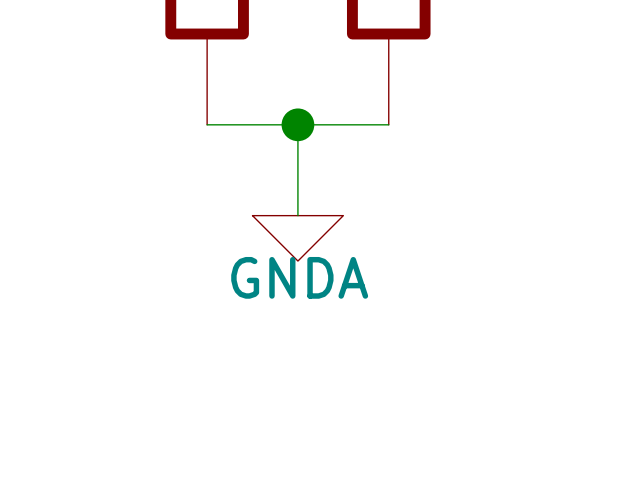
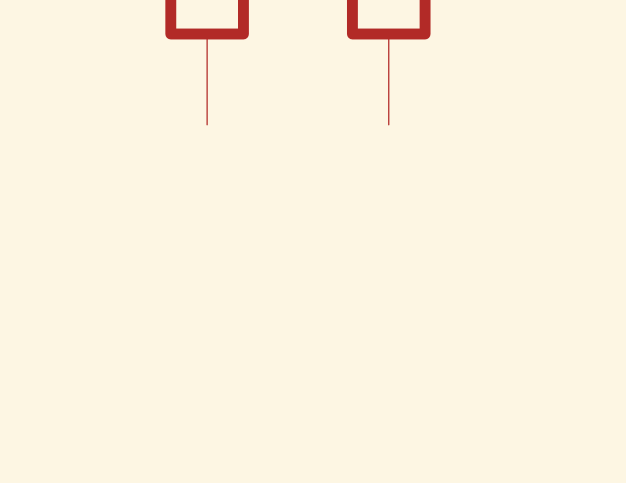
wire: (207, 124) (388, 124) -> none
wire: (297, 124) (297, 215) -> none
junction: (297, 124) -> none
power symbol: GNDA (297, 238) -> none

